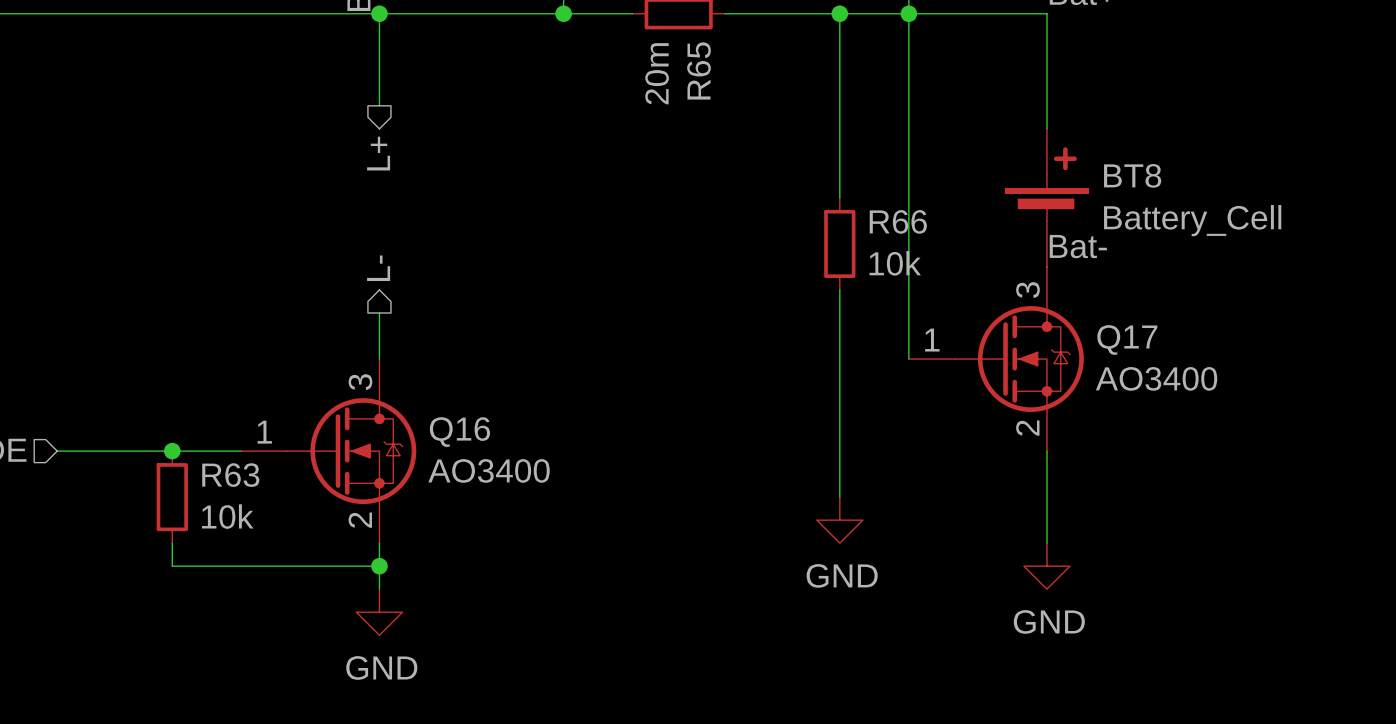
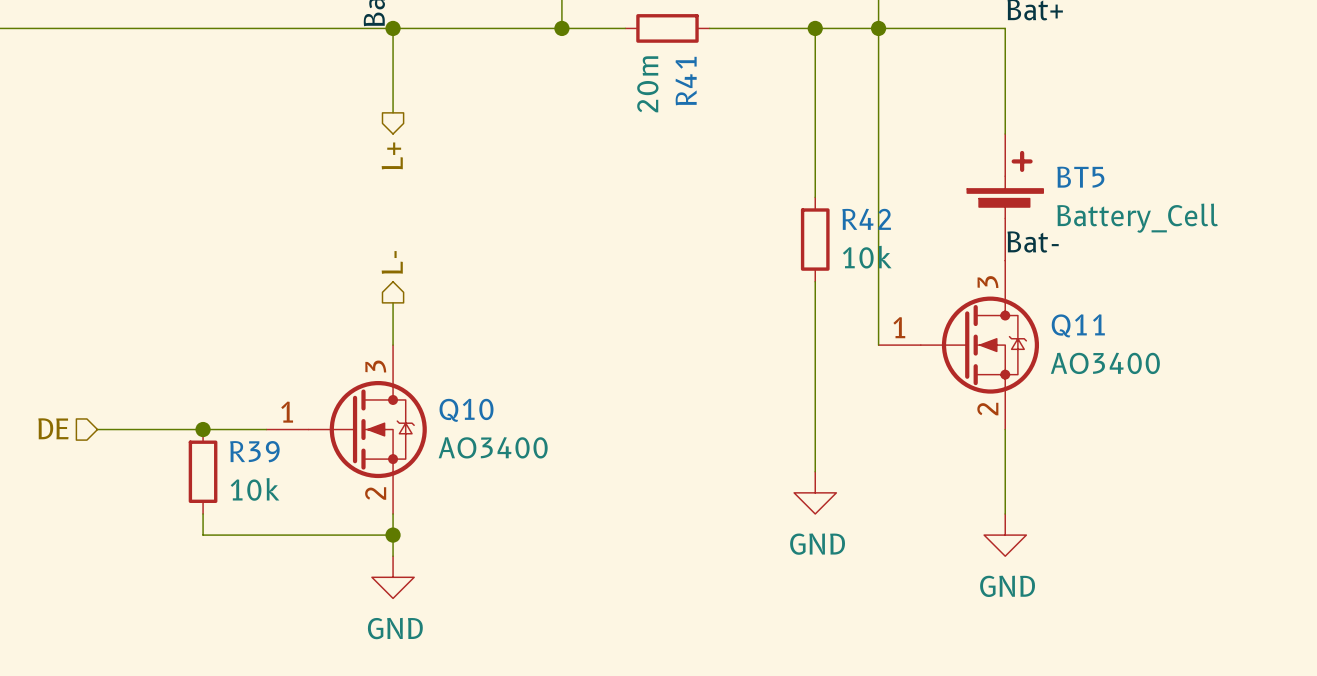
R65 name: R65 (698, 70) -> R41 (686, 81)
BT8 name: BT8 (1132, 175) -> BT5 (1080, 177)
R66 name: R66 (898, 221) -> R42 (866, 219)
Q17 name: Q17 (1127, 339) -> Q11 (1078, 325)
Q16 name: Q16 (459, 432) -> Q10 (466, 410)
R63 name: R63 (230, 475) -> R39 (254, 451)

